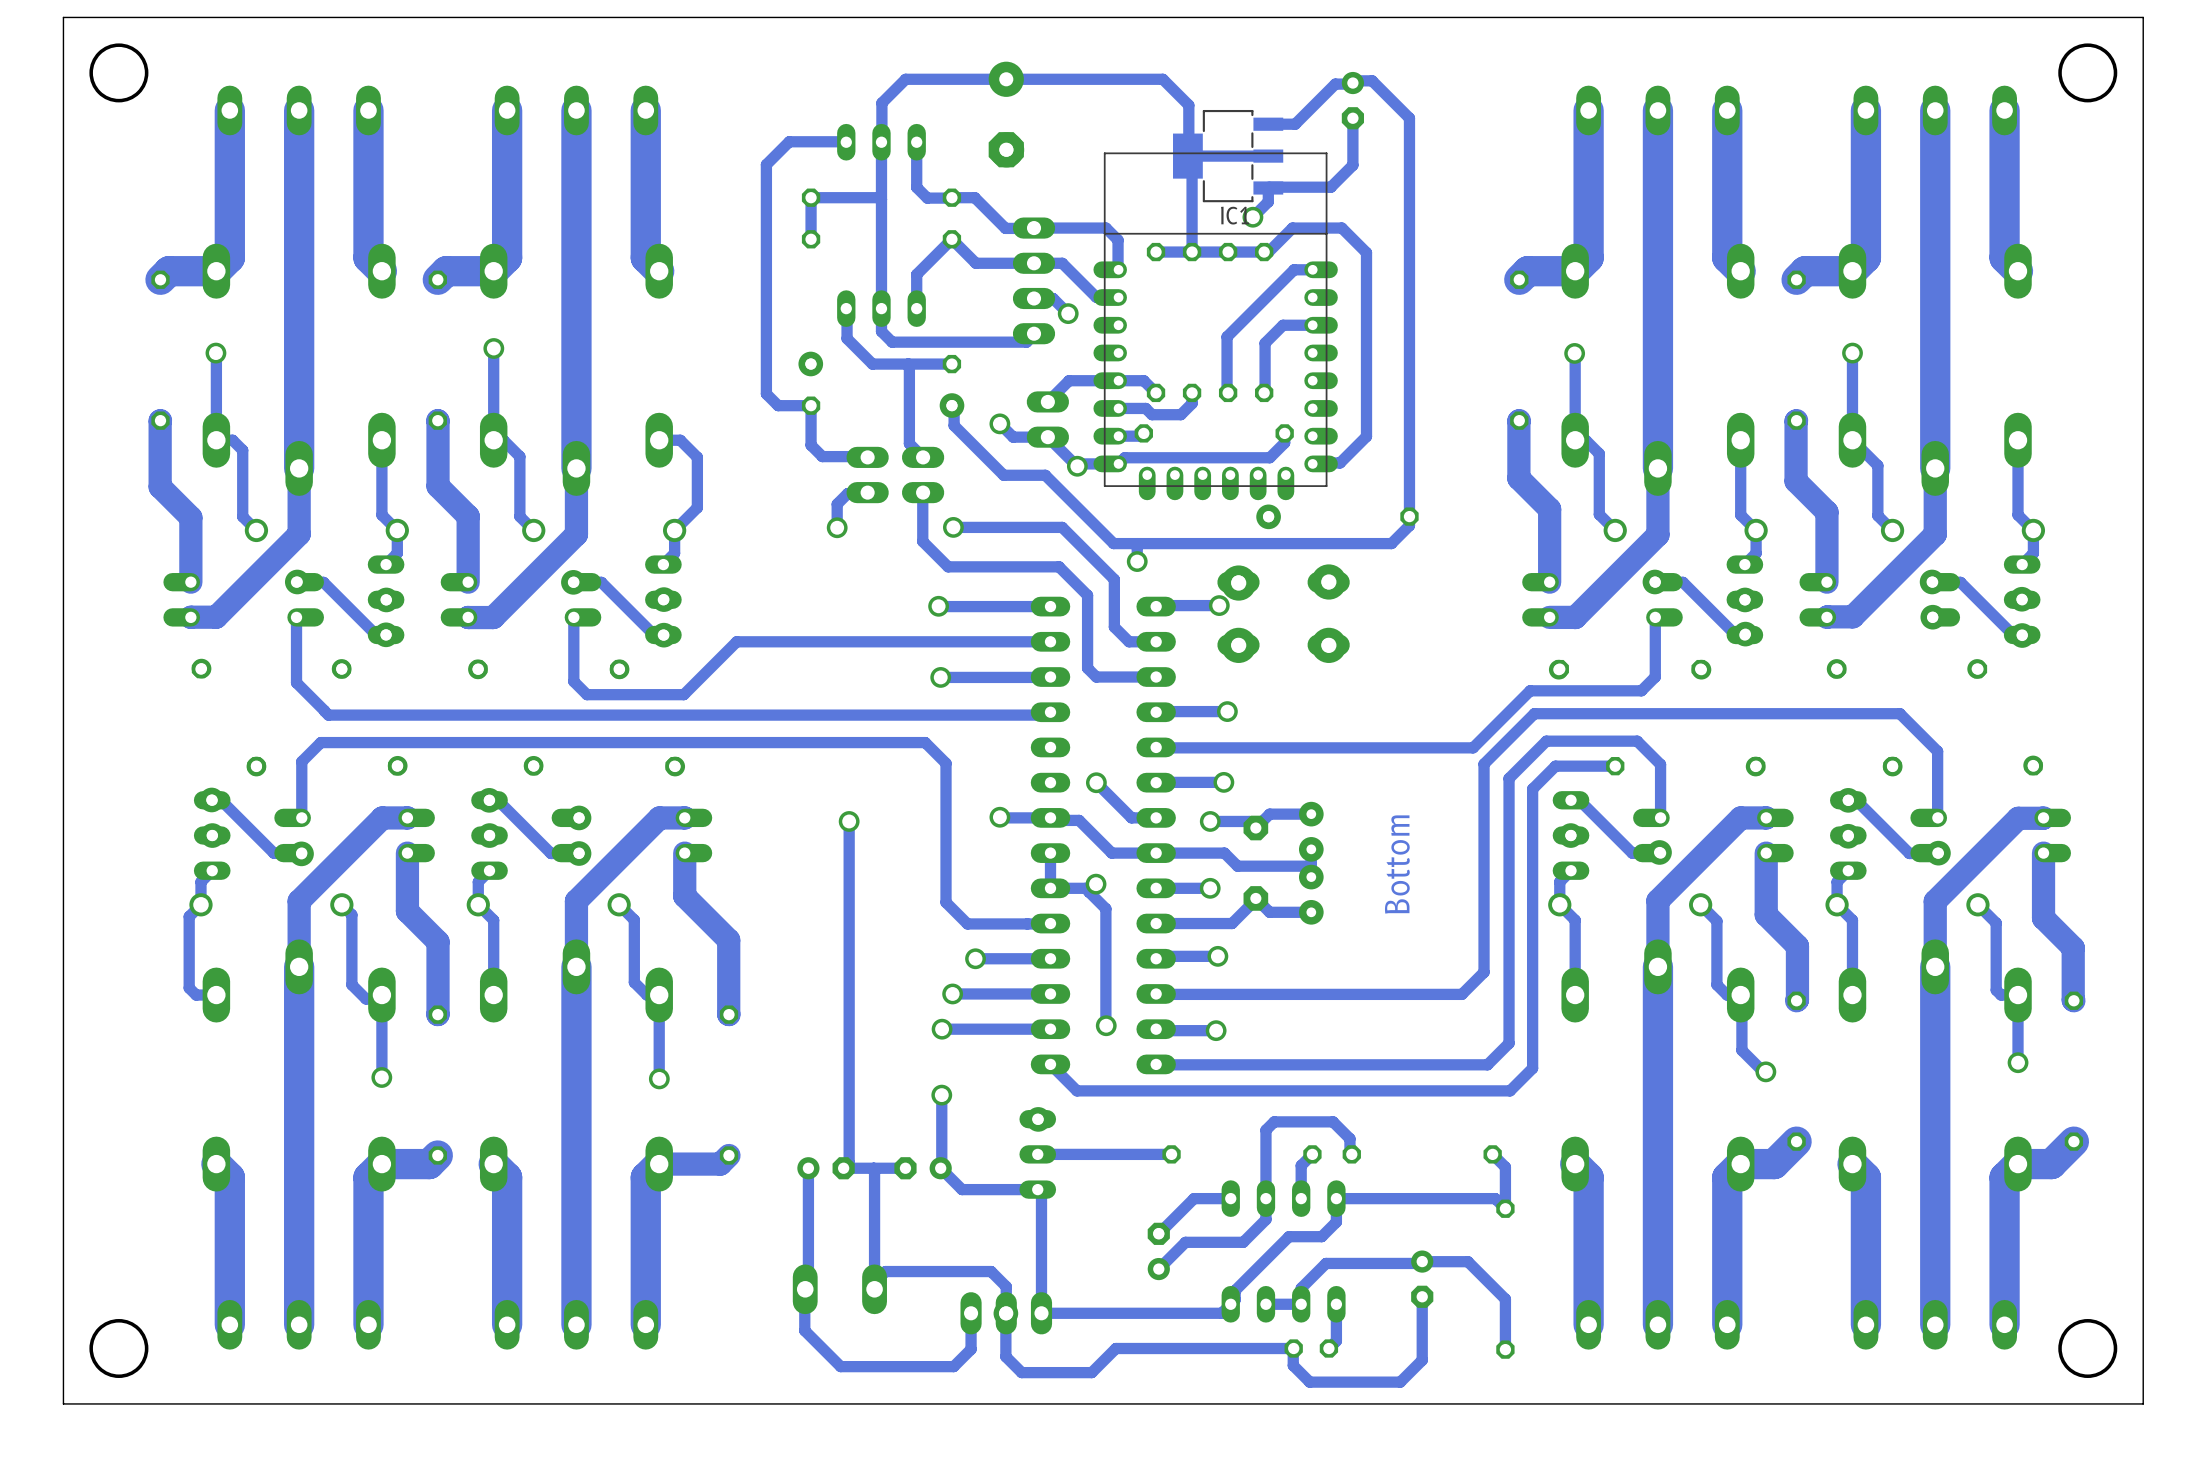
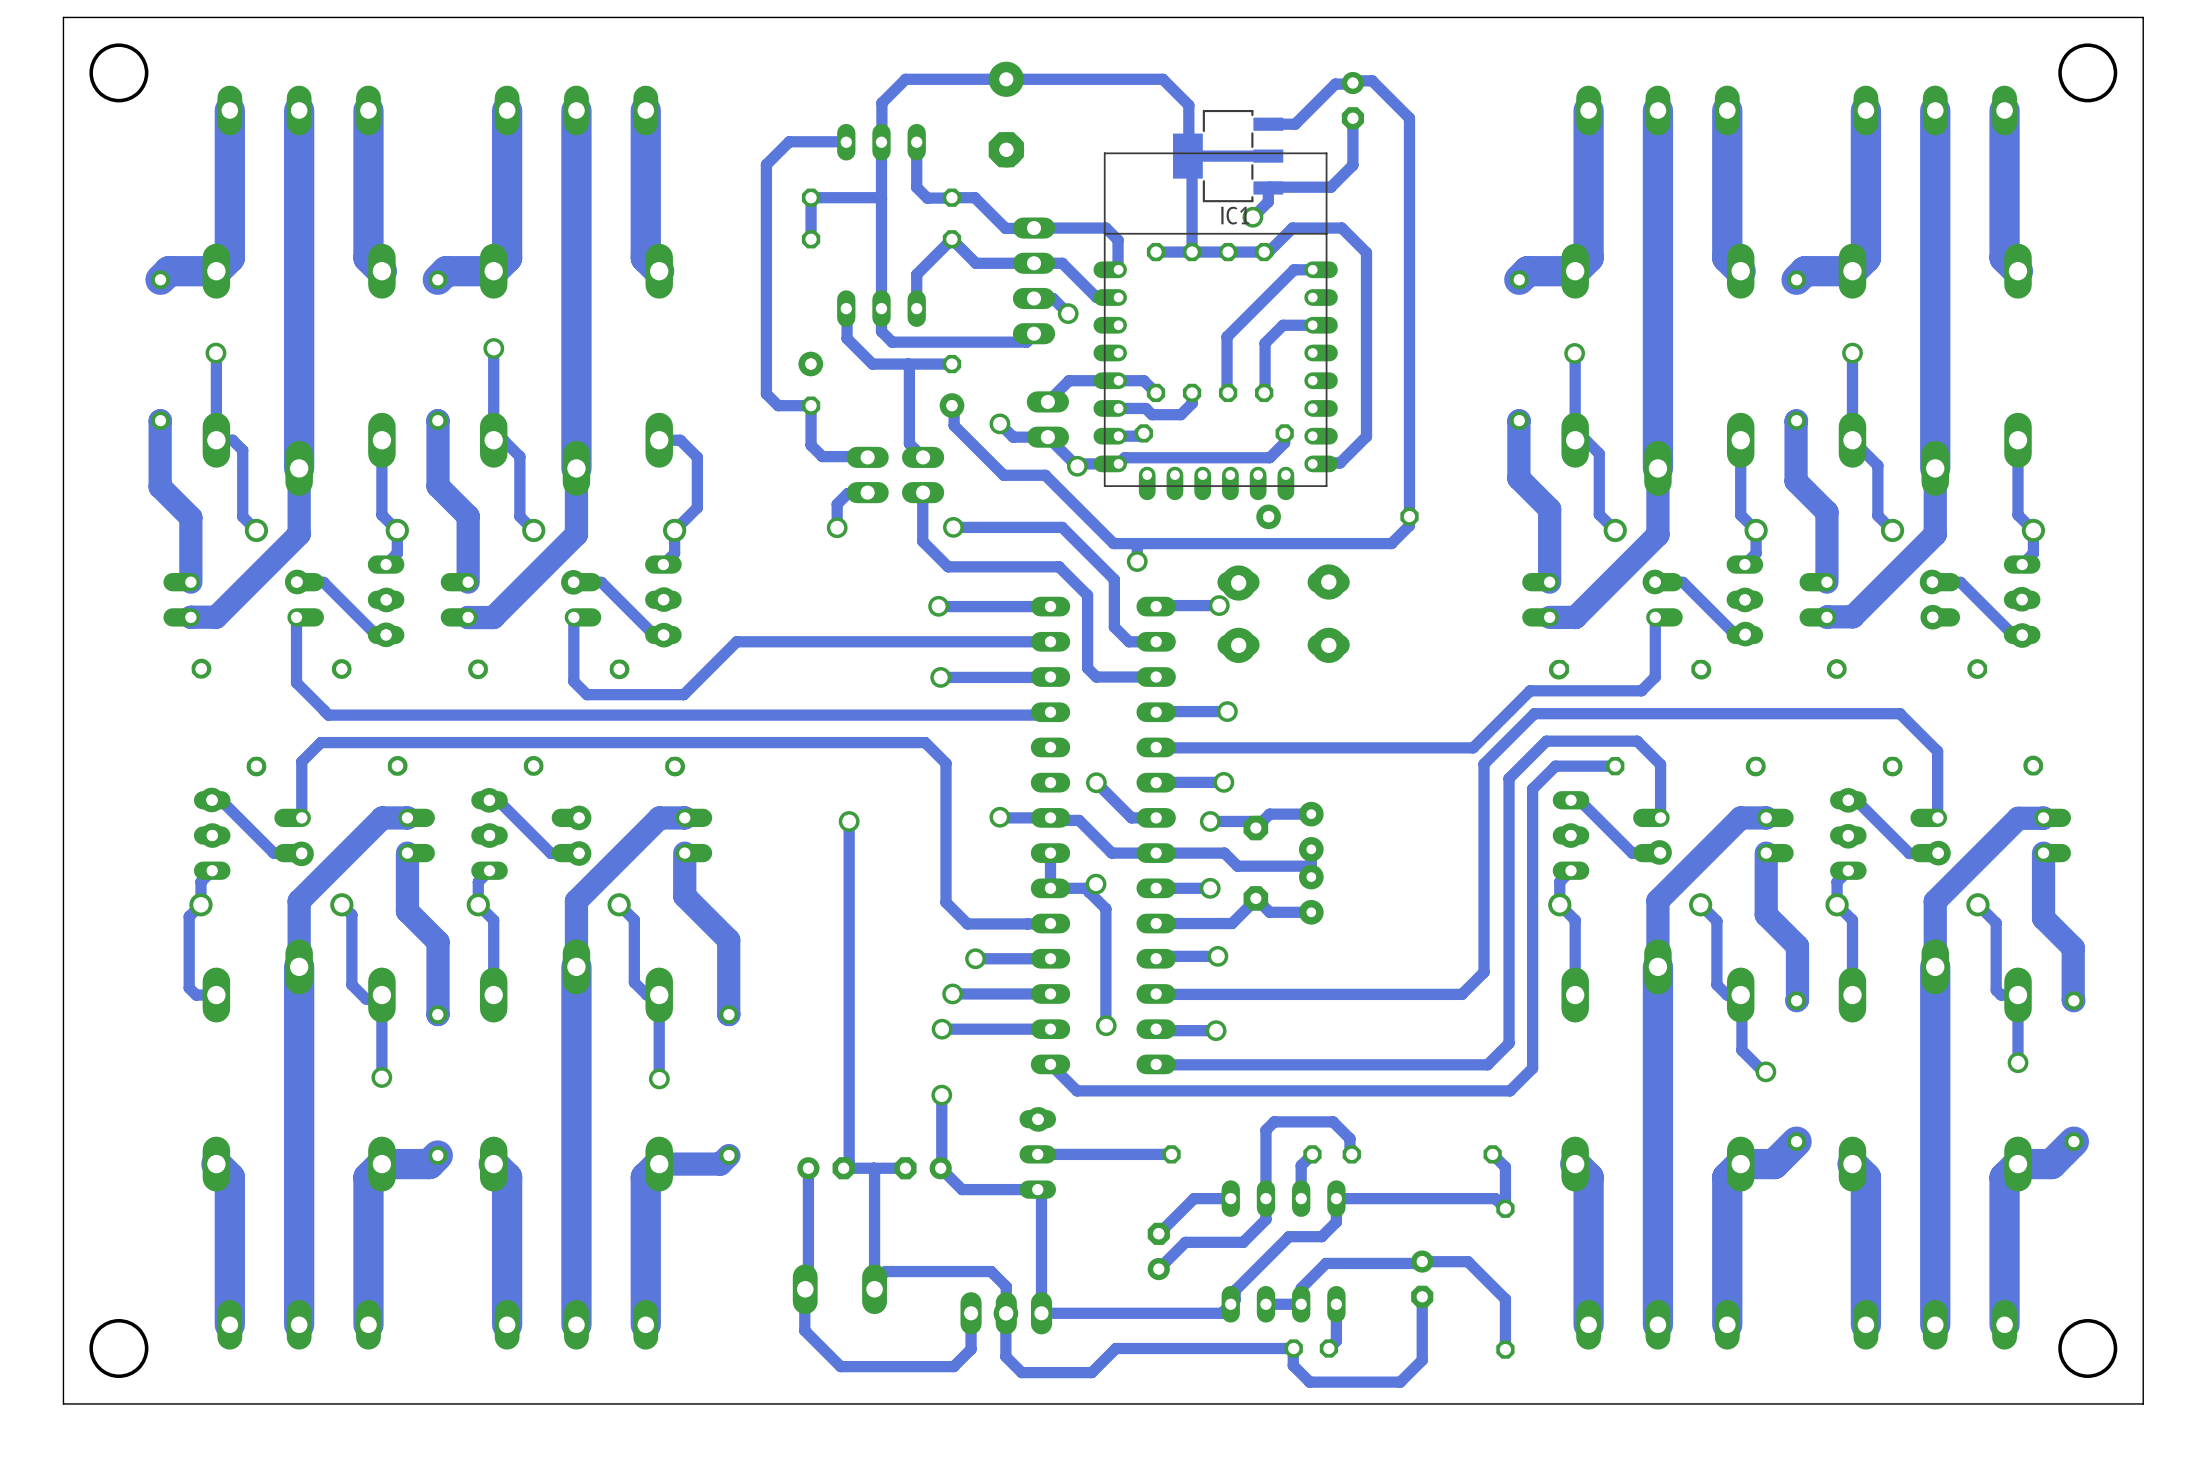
text: Bottom (1397, 864) -> none

